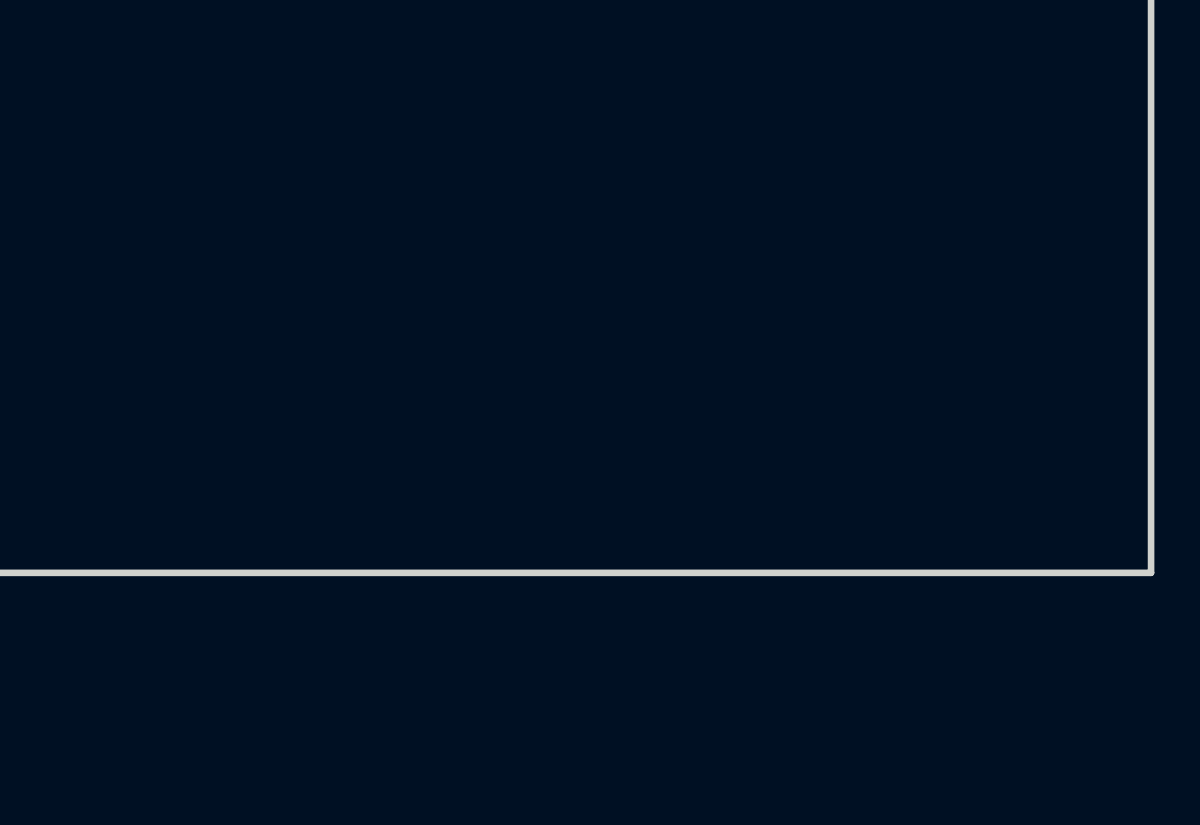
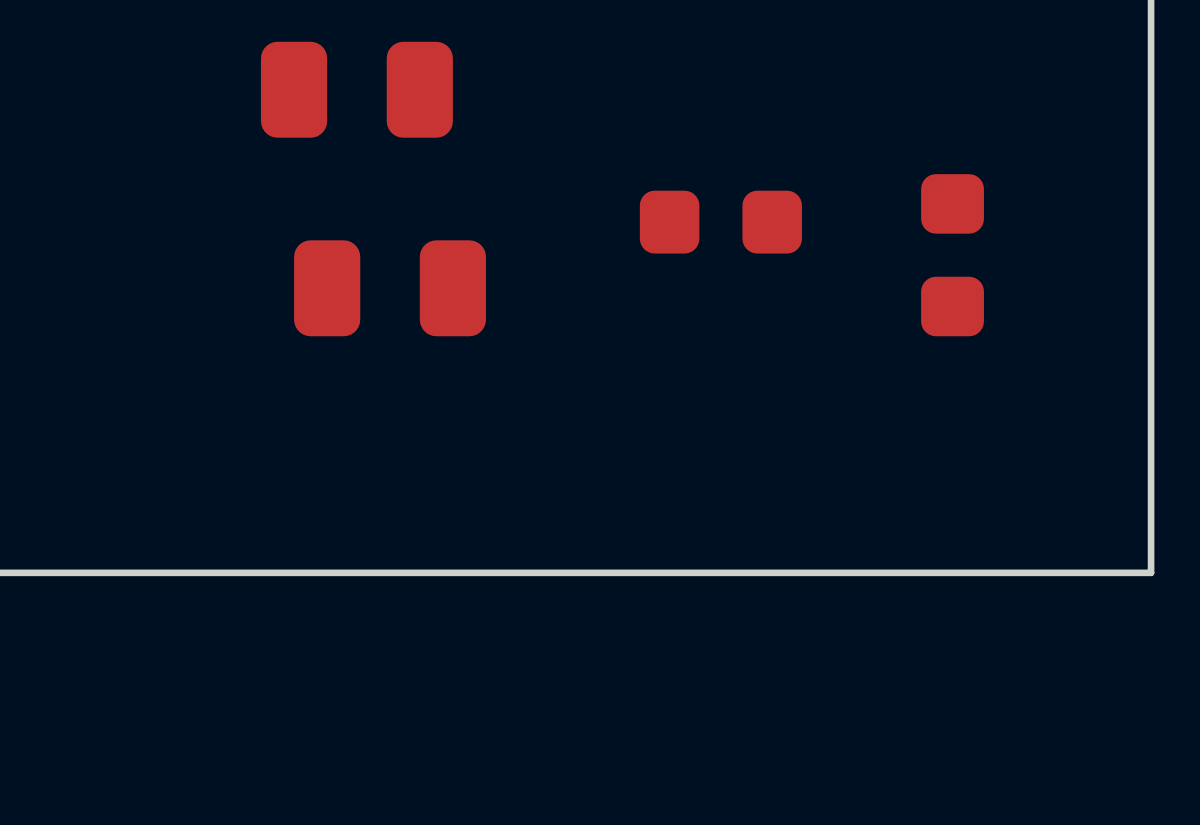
part: none -> (356, 89)
part: none -> (720, 222)
part: none -> (952, 255)
part: none -> (390, 288)

